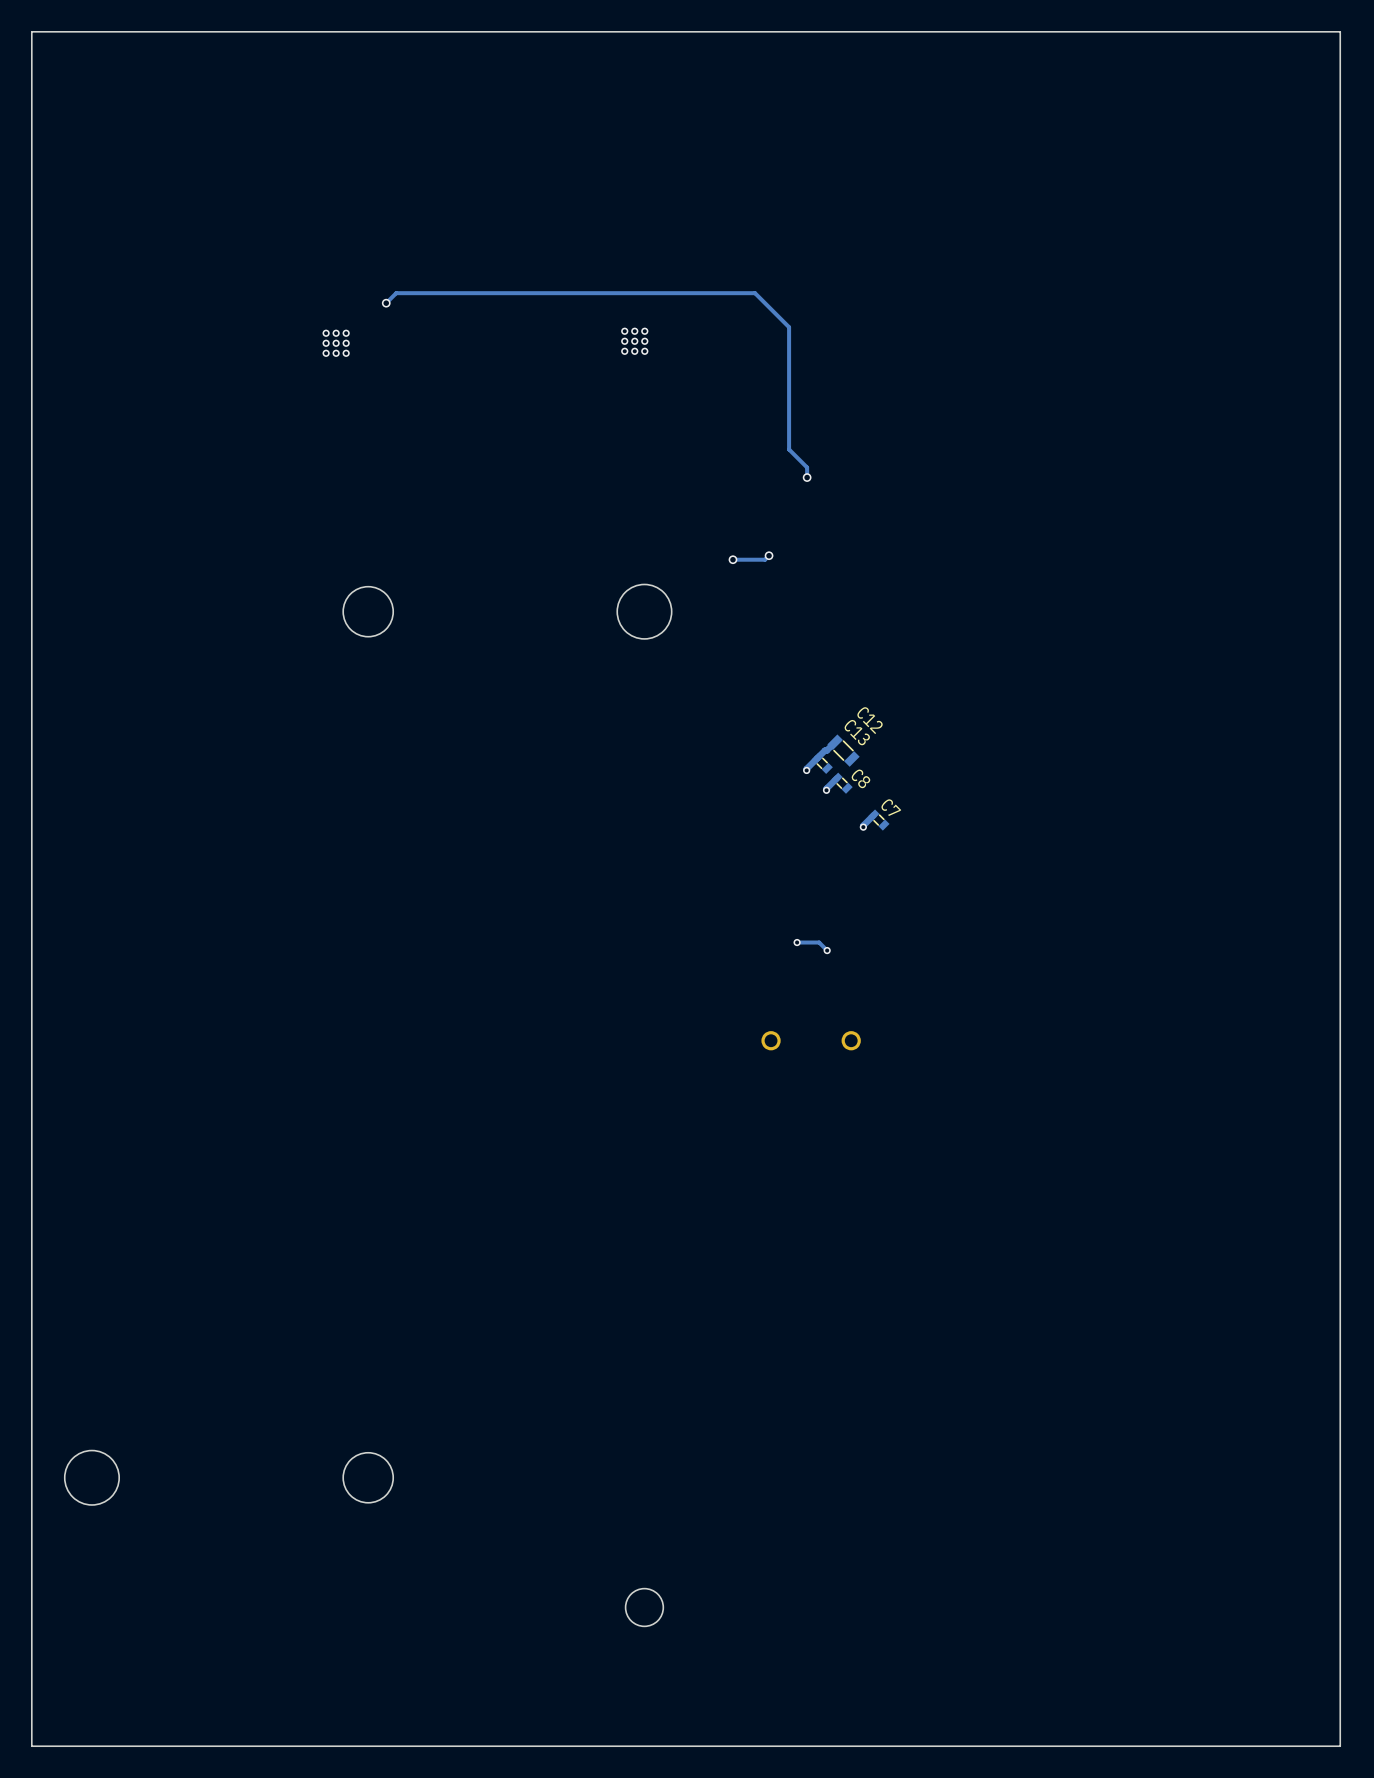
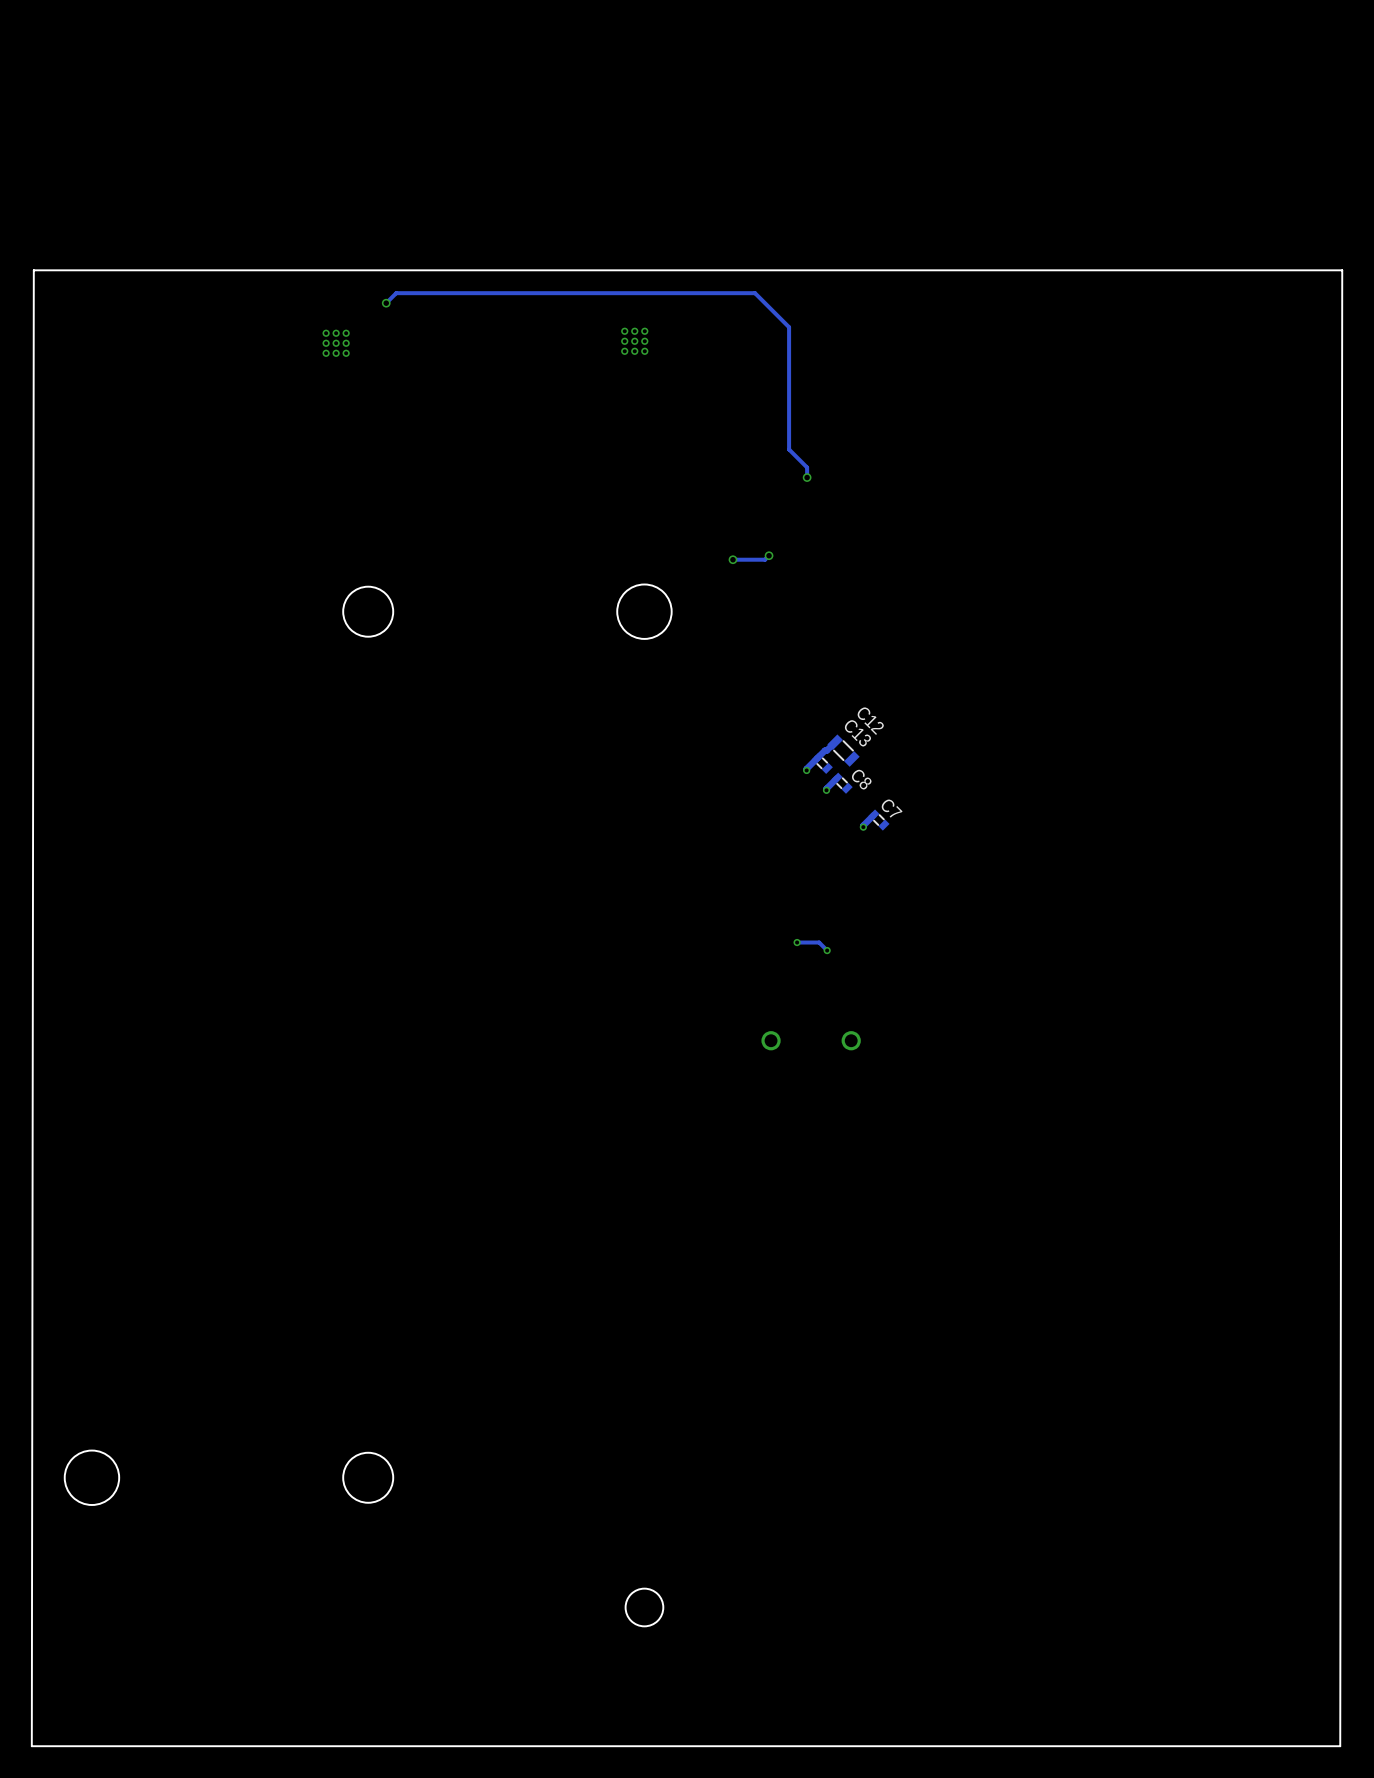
board edge: (1340, 1746) (1340, 31) (31, 31) (31, 1746) -> (1340, 1746) (1342, 270) (33, 270) (31, 1746)

